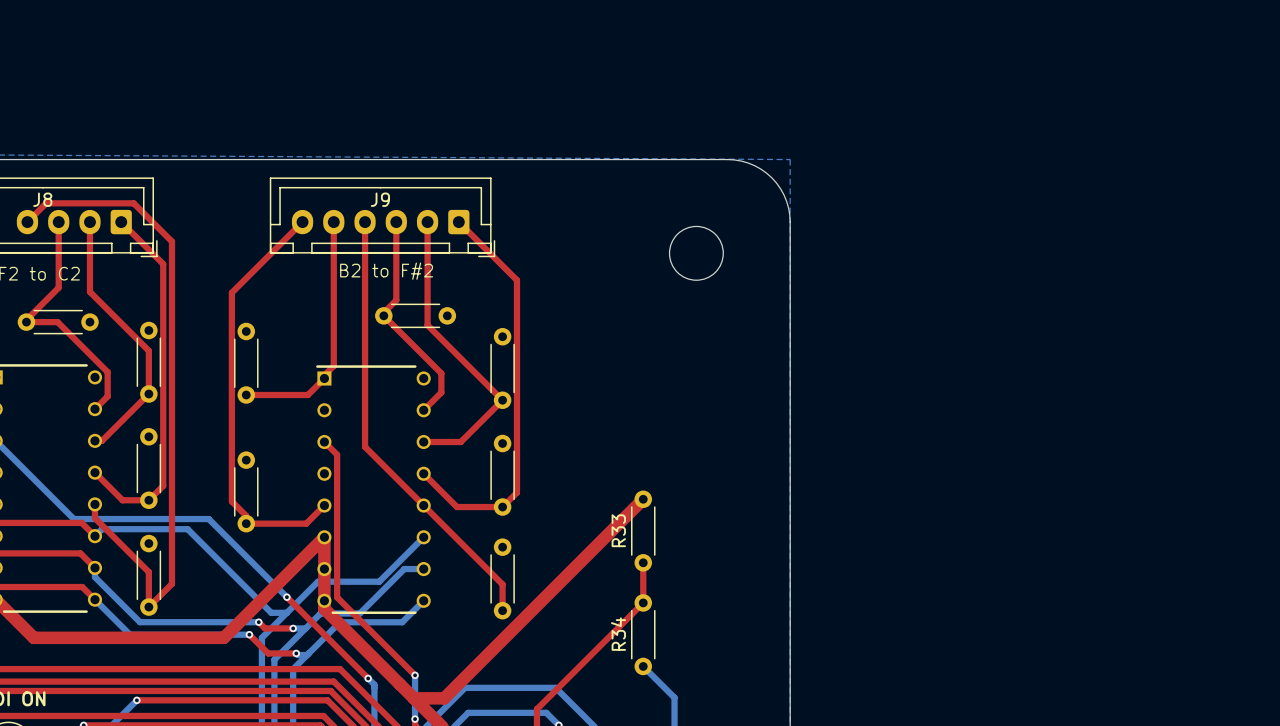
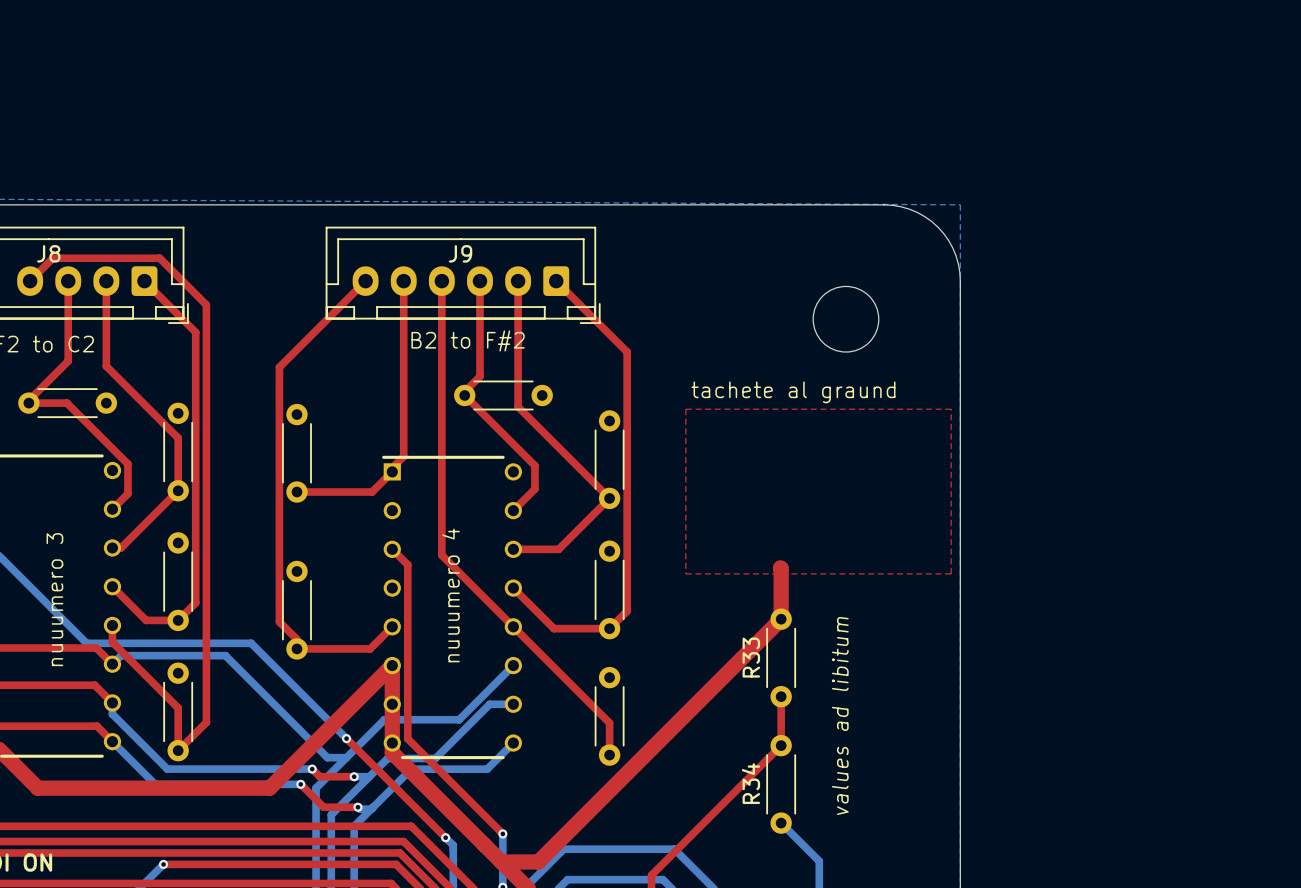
text: none -> tachete al graund (793, 392)
top zone outline: none -> (685, 409) (951, 409) (951, 573) (685, 573) (685, 409)
top track: none -> (780, 567) (781, 619)
text: none -> nuuumero 4 (451, 595)
text: none -> nuuumero 3 (54, 599)
text: none -> values ad libitum (840, 715)

